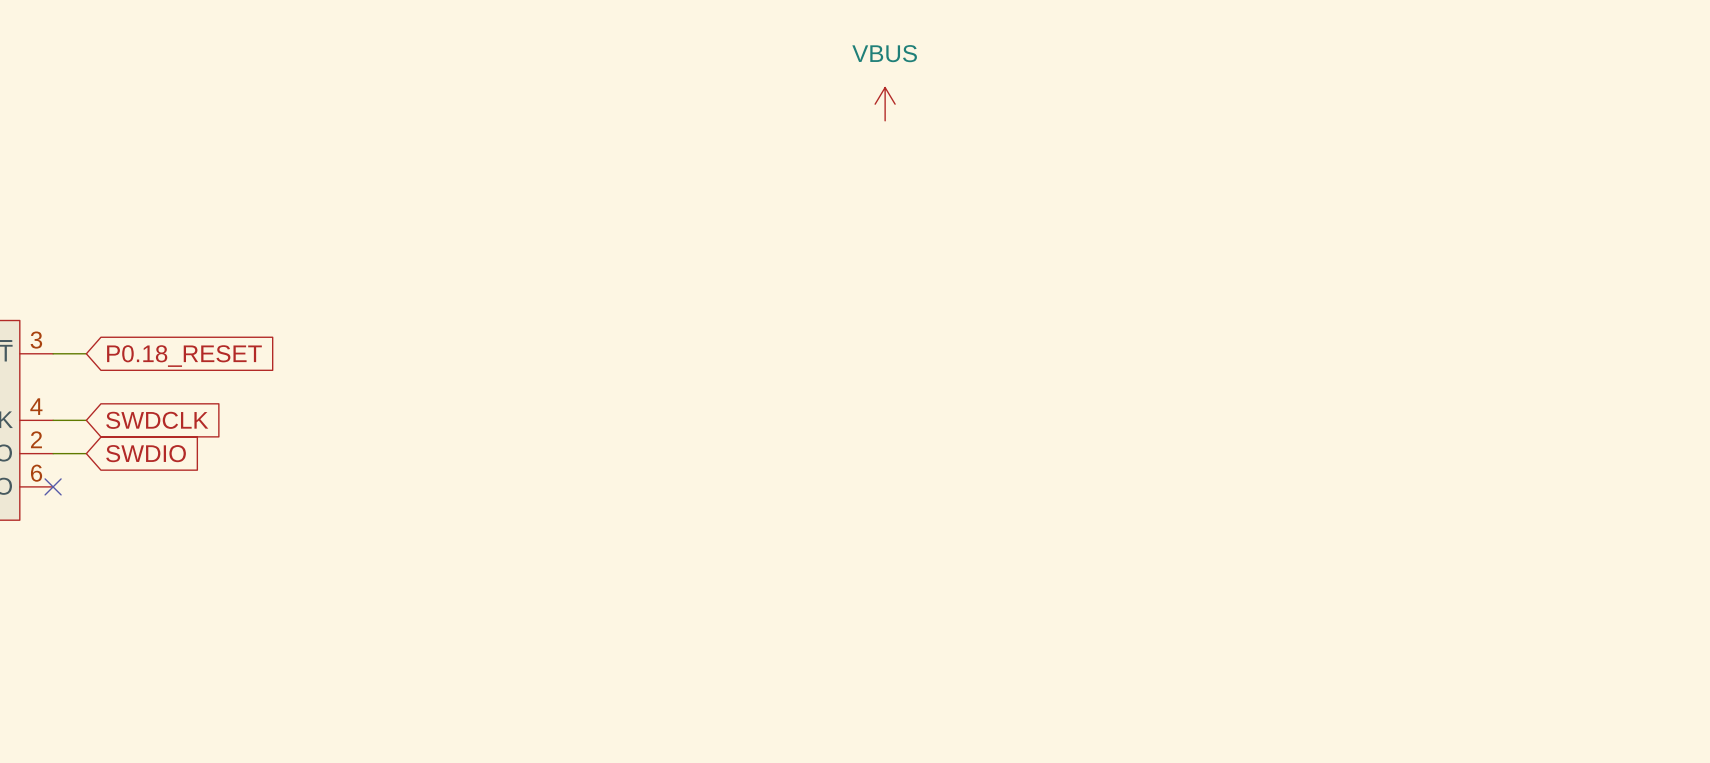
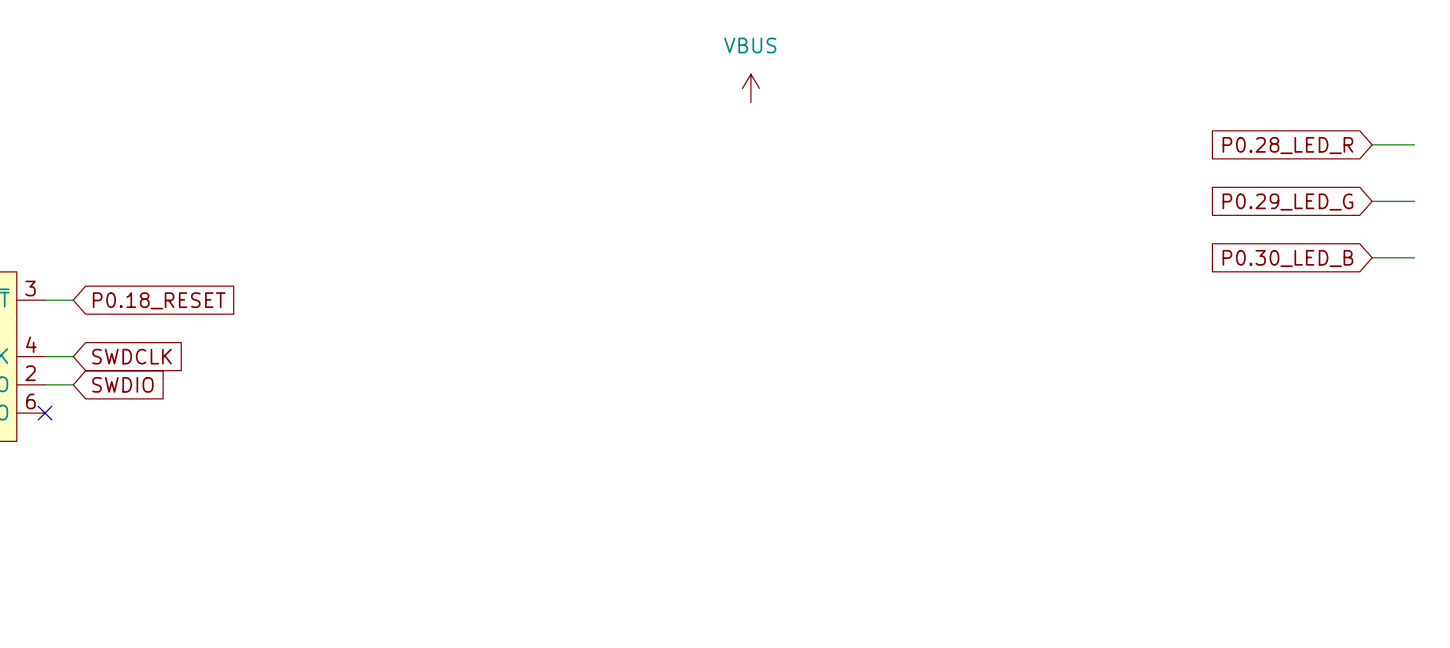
wire: none -> (1372, 144) (1414, 144)
global label: none -> P0.28_LED_R (1287, 145)
wire: none -> (1372, 201) (1414, 201)
global label: none -> P0.29_LED_G (1287, 202)
wire: none -> (1372, 257) (1414, 257)
global label: none -> P0.30_LED_B (1287, 258)

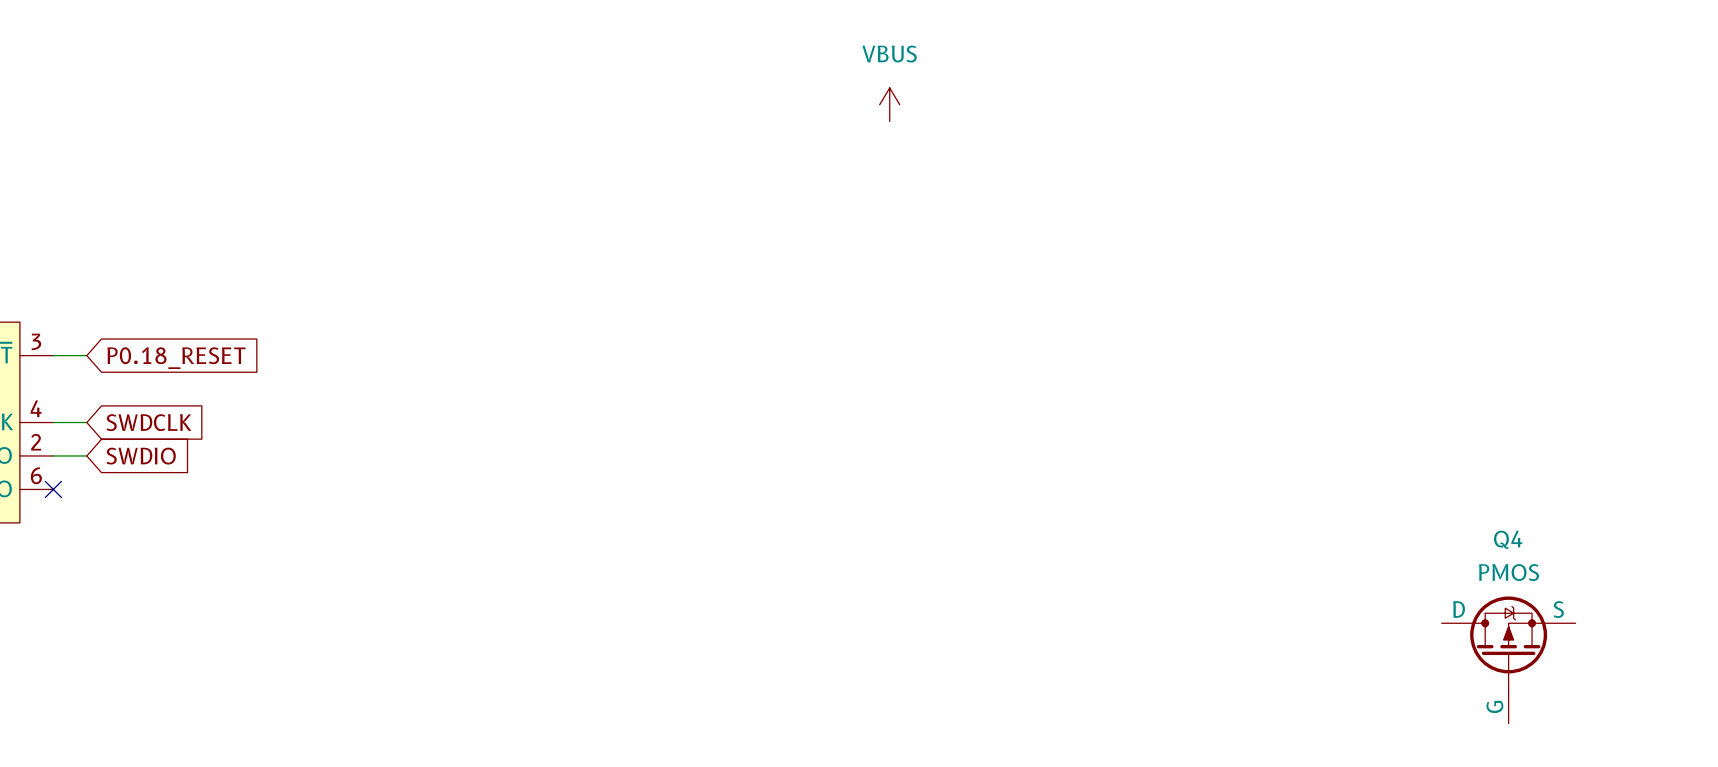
wire: (1372, 144) (1414, 144) -> none
global label: P0.28_LED_R (1287, 145) -> none
wire: (1372, 201) (1414, 201) -> none
global label: P0.29_LED_G (1287, 202) -> none
wire: (1372, 257) (1414, 257) -> none
global label: P0.30_LED_B (1287, 258) -> none
Q4: none -> PMOS (1508, 660)

